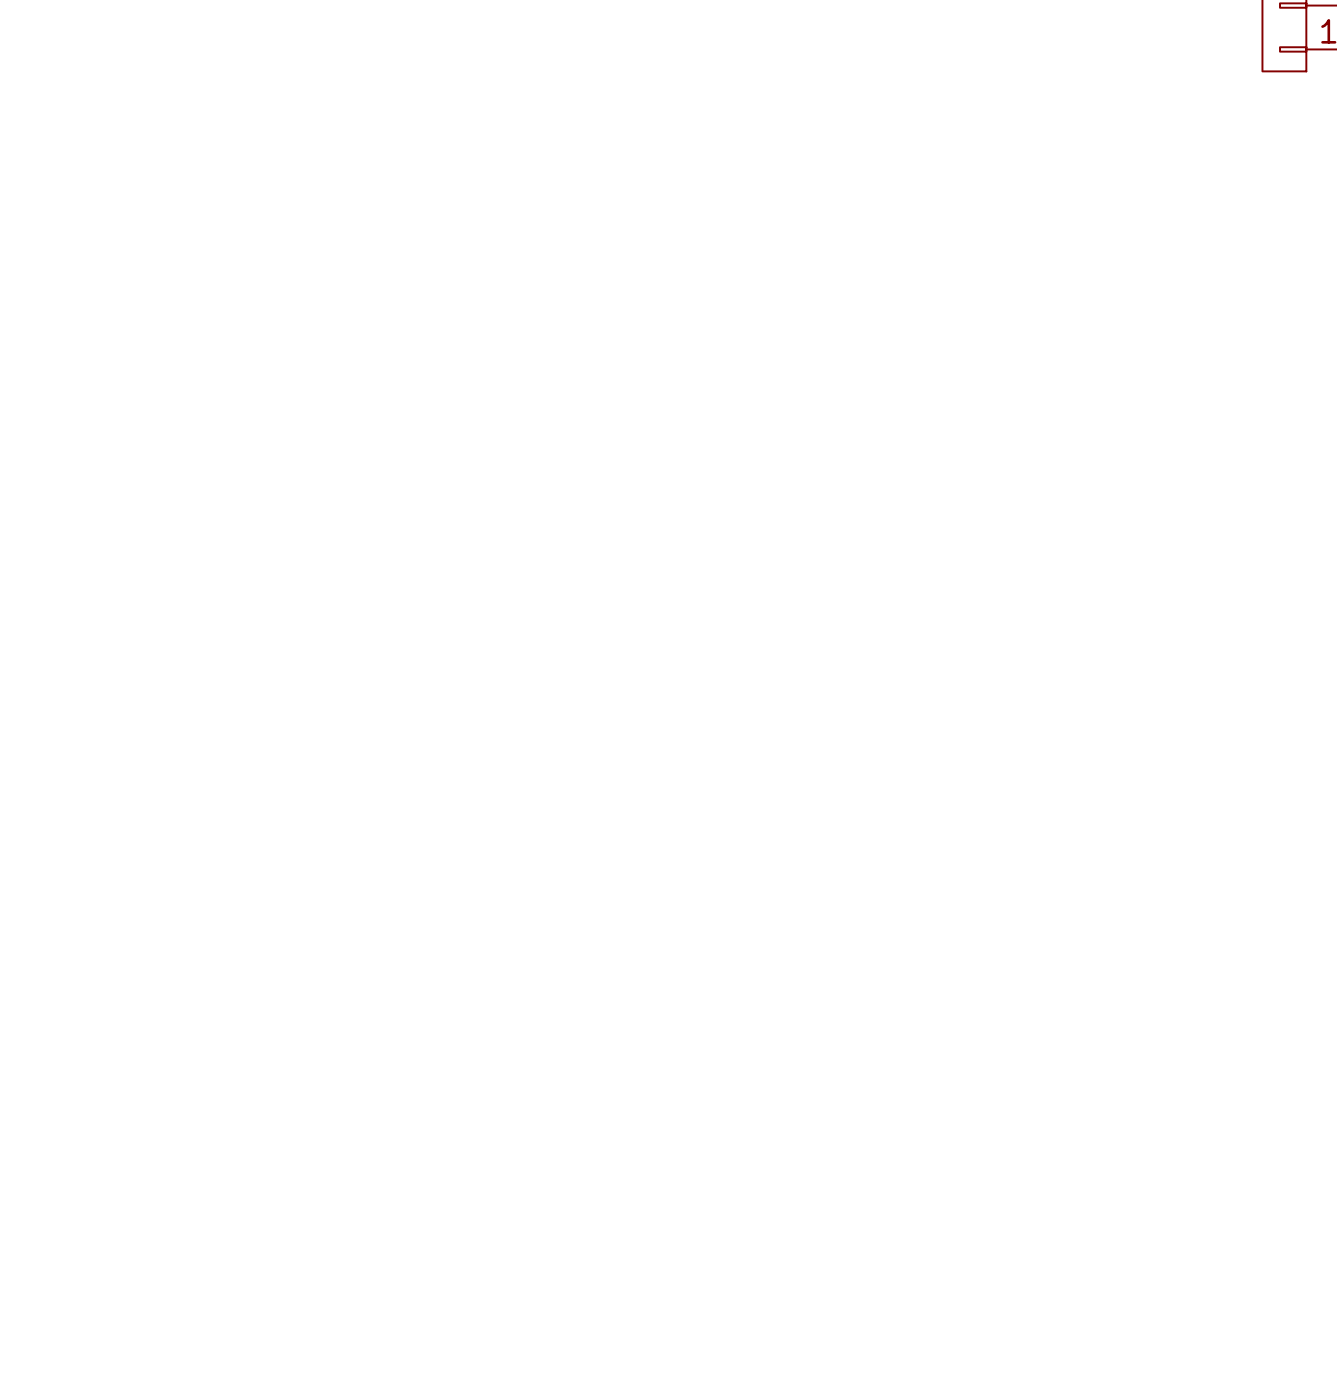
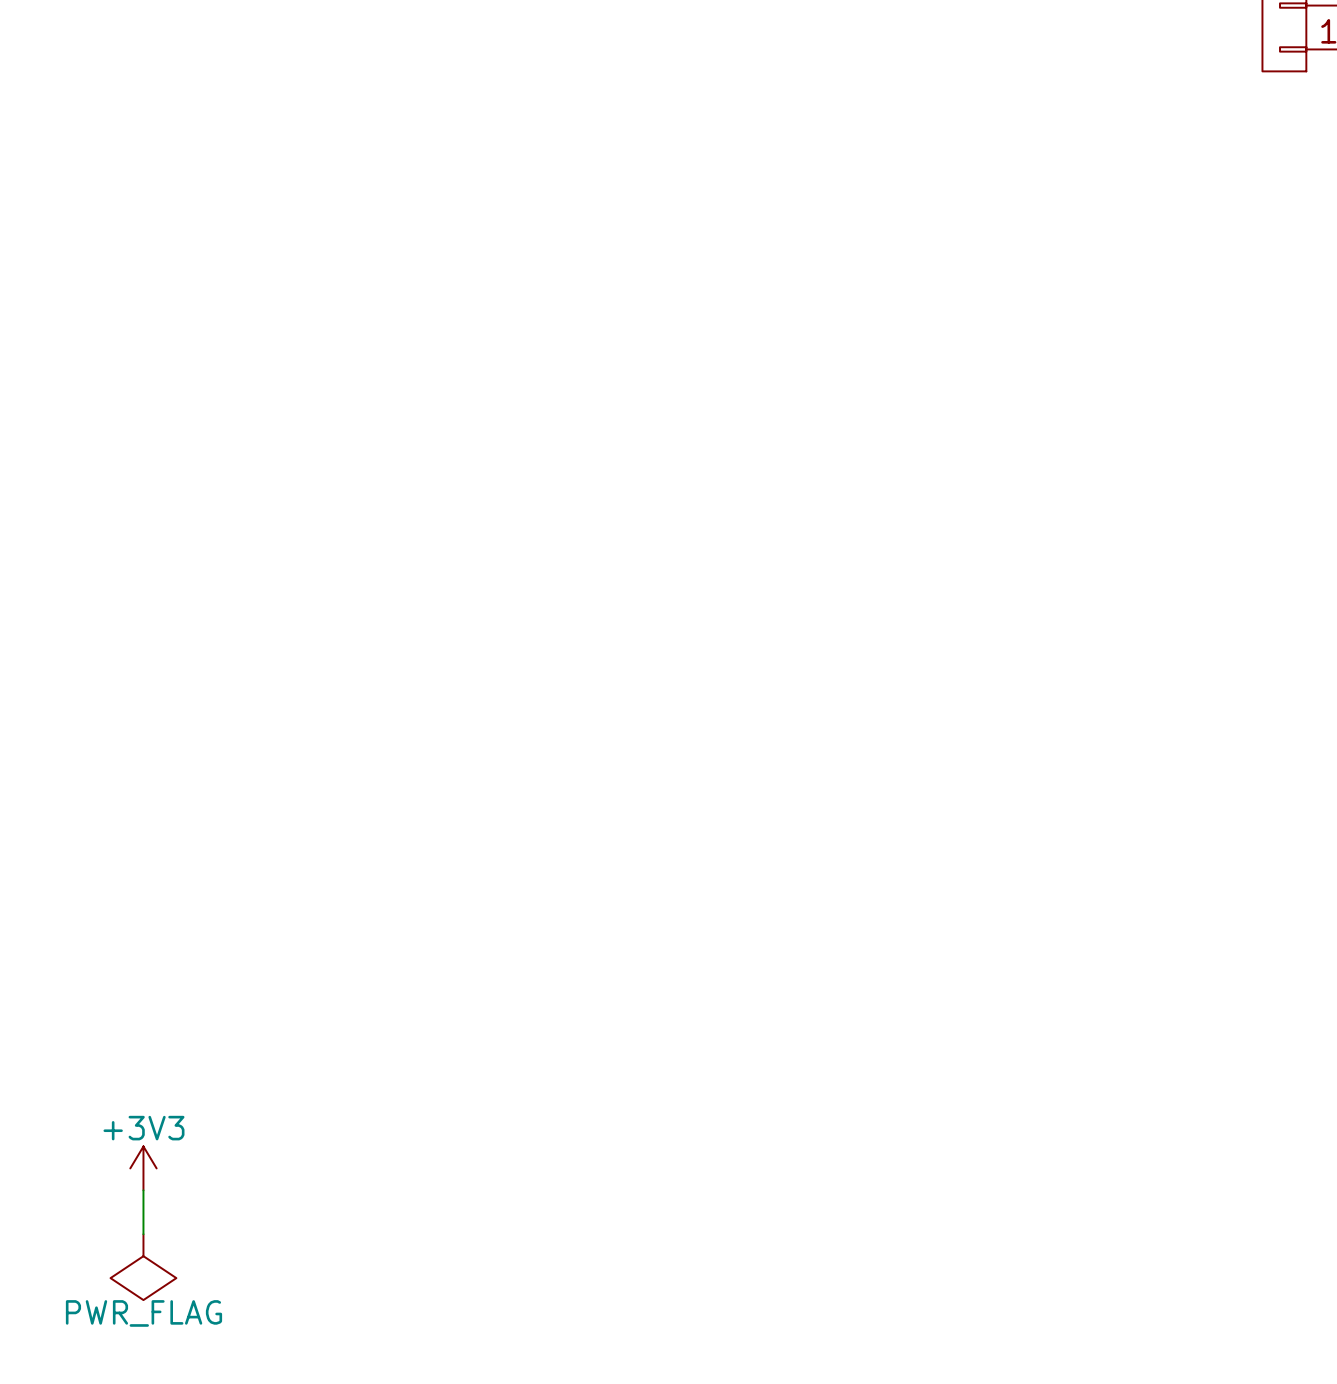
power symbol: none -> +3V3 (143, 1168)
wire: none -> (143, 1190) (143, 1234)
power symbol: none -> PWR_FLAG (143, 1267)

